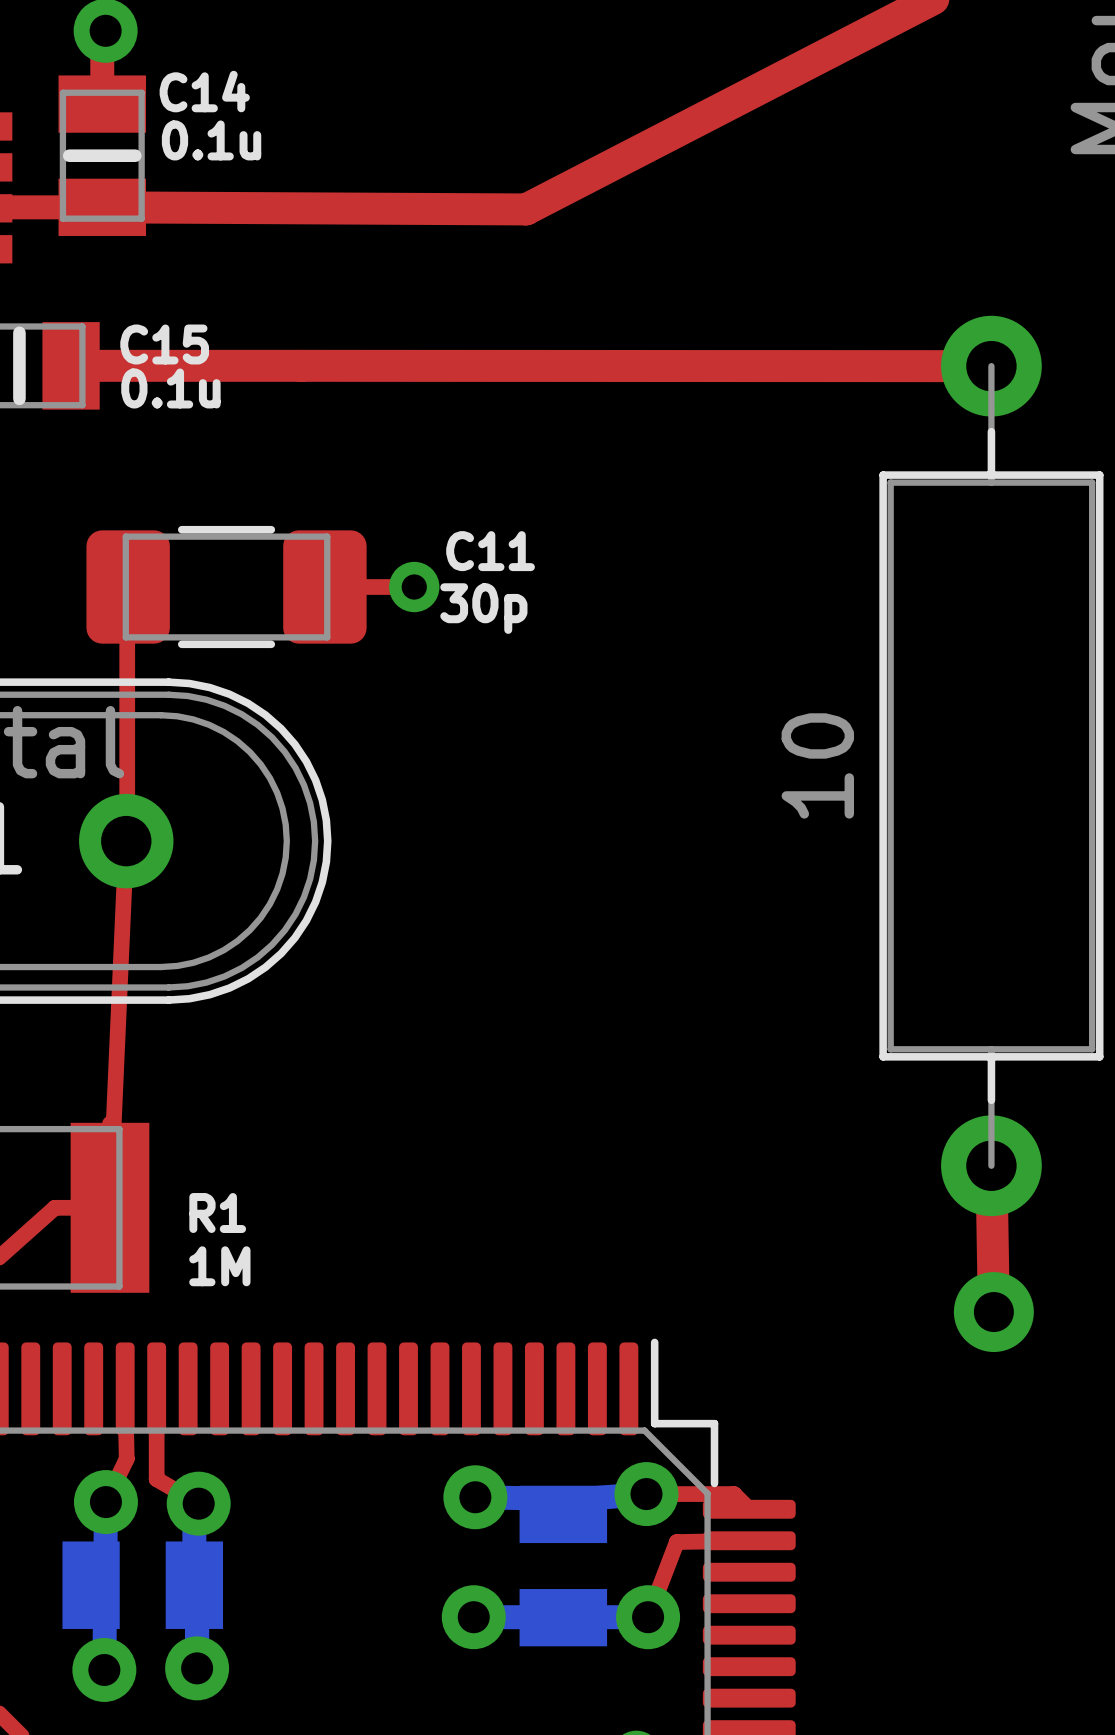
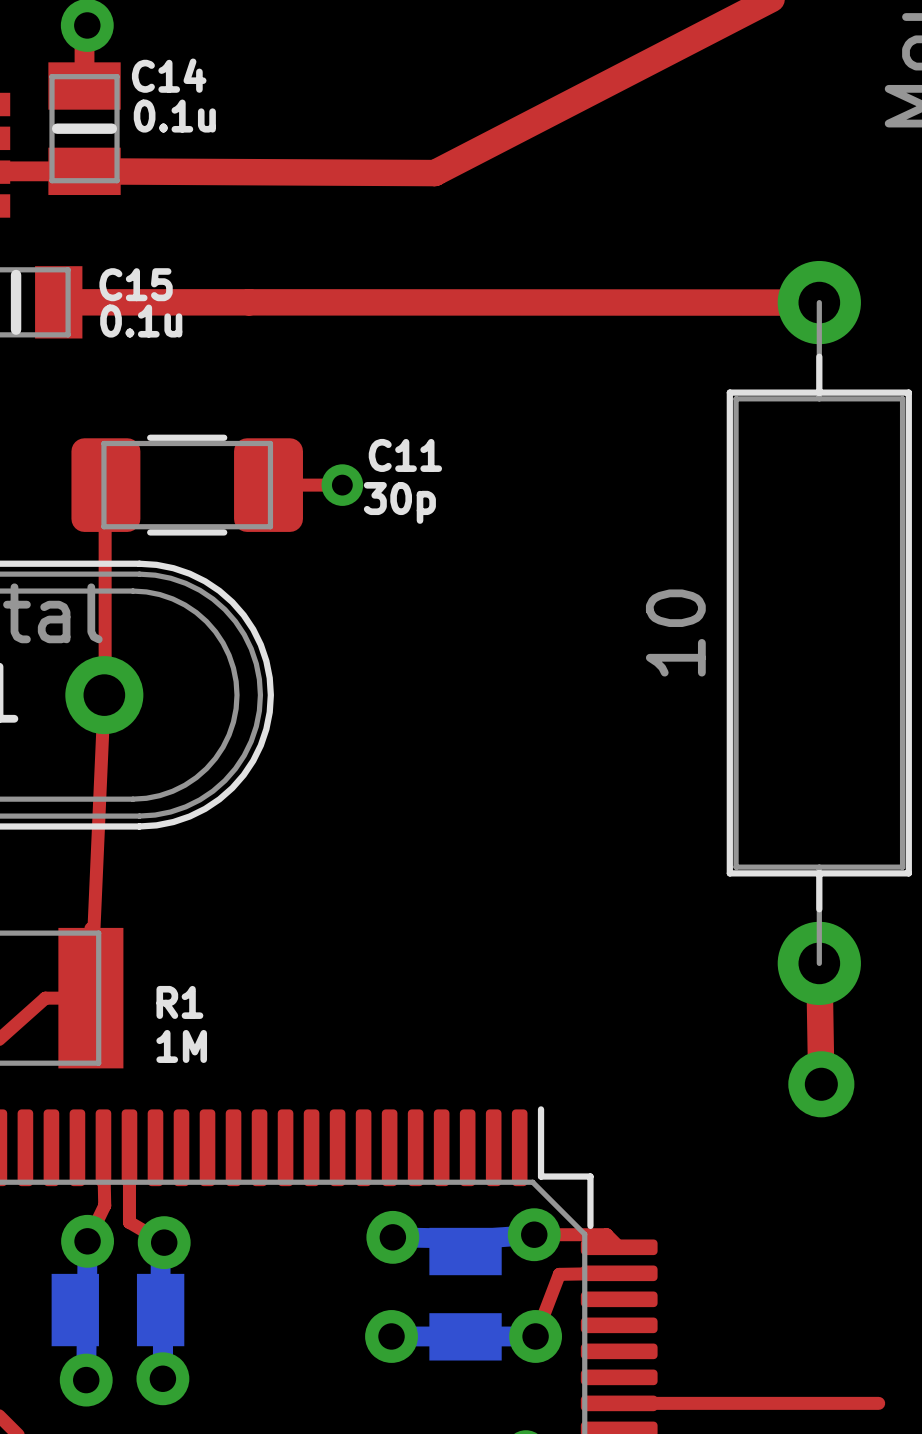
top track: none -> (619, 1403) (878, 1403)

